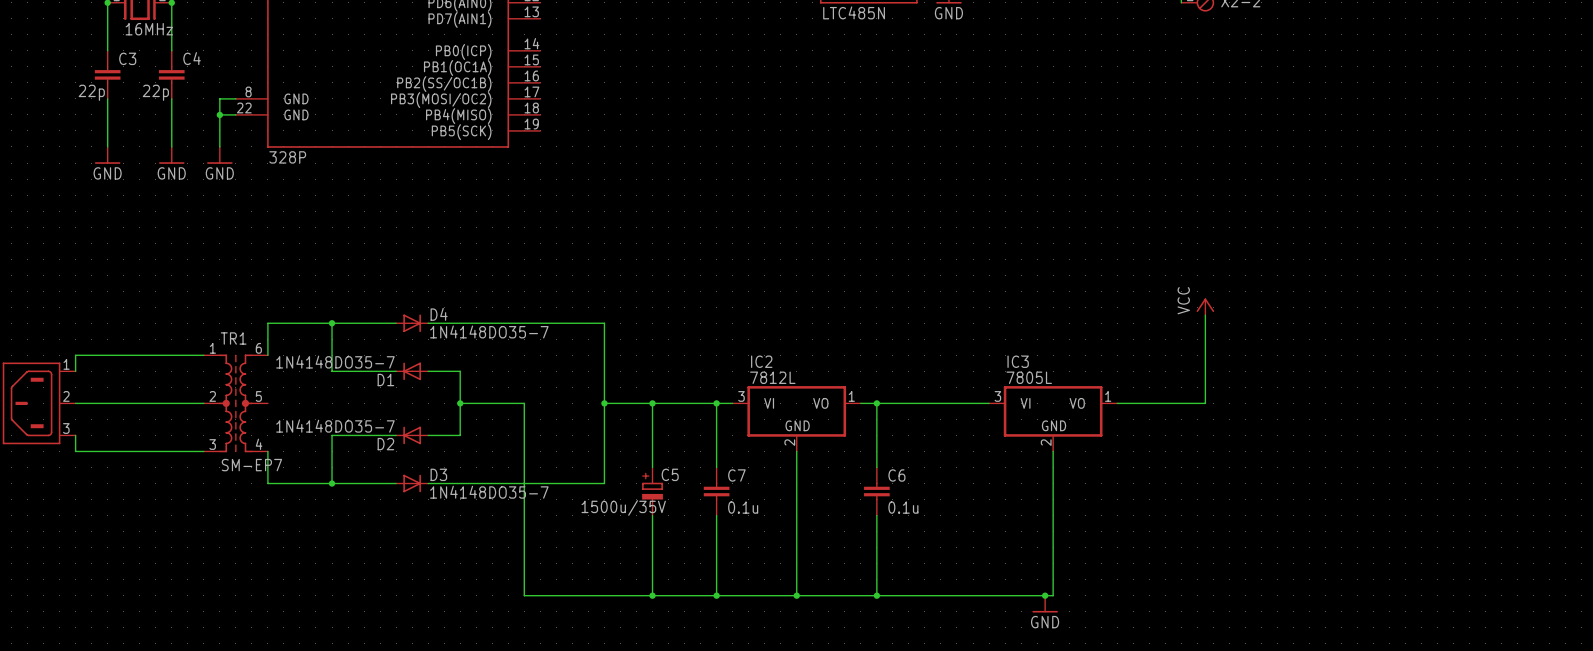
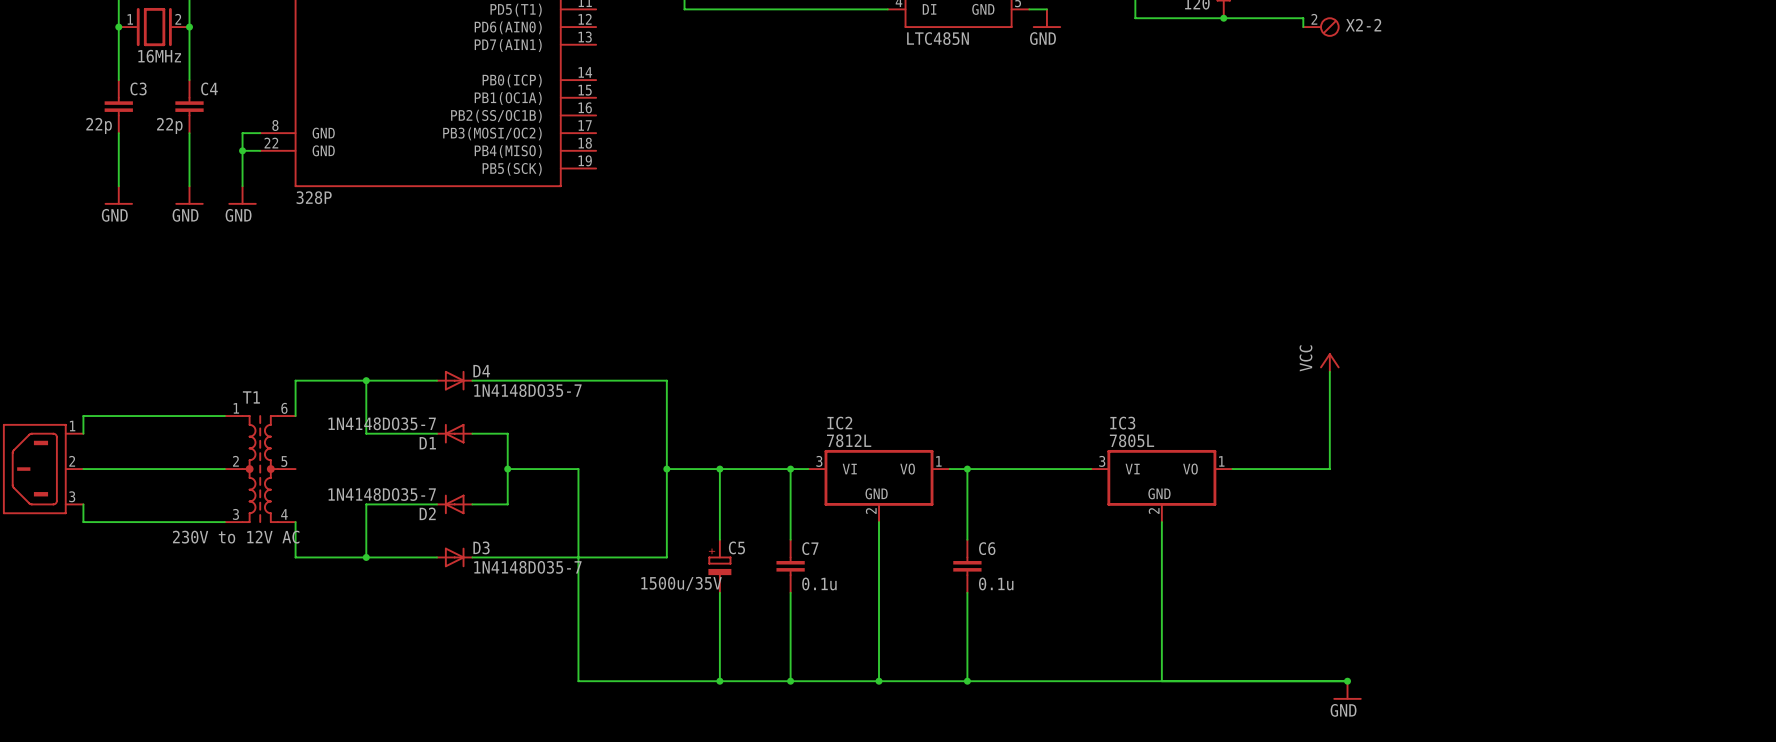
TR1 name: TR1 (233, 338) -> T1 (251, 397)
TR1 value: SM-EP7 (251, 465) -> 230V to 12V AC (236, 537)
junction: (1045, 595) -> none
wire: none -> (1161, 681) (1347, 681)
junction: none -> (1347, 681)
power symbol: GND (1045, 604) -> none
power symbol: none -> GND (1347, 690)

